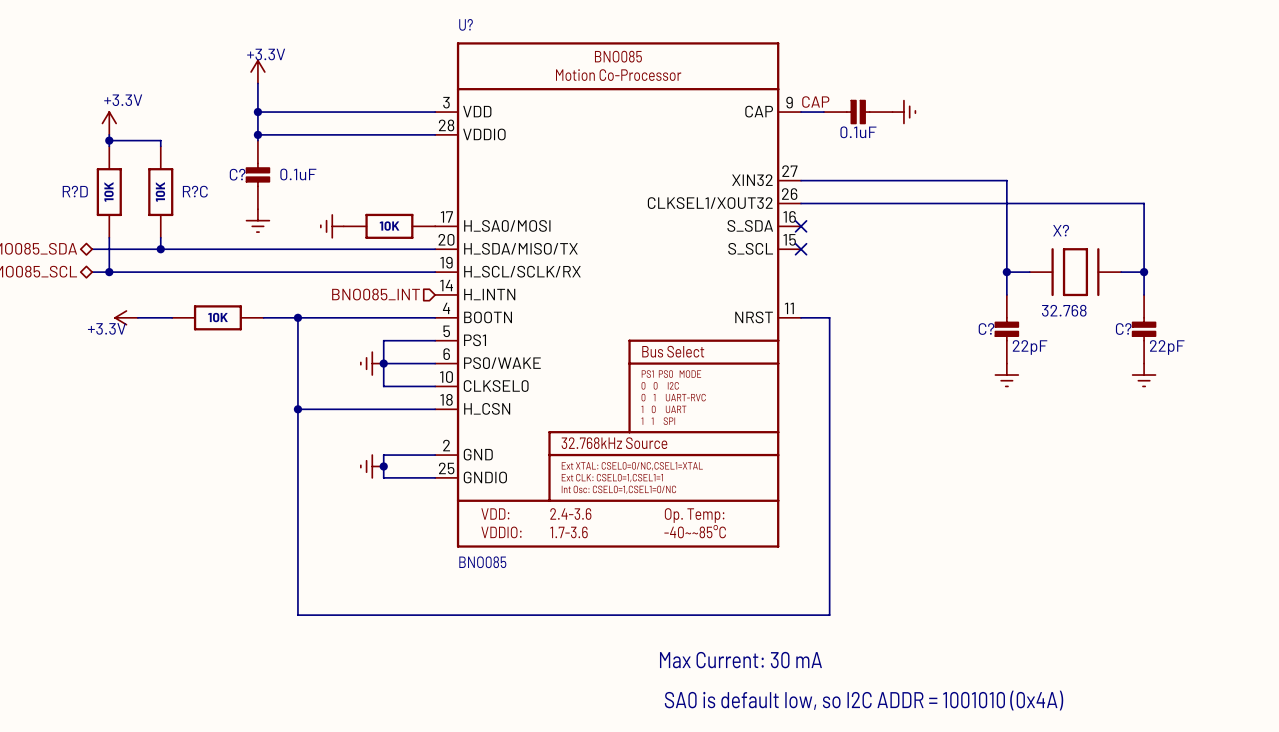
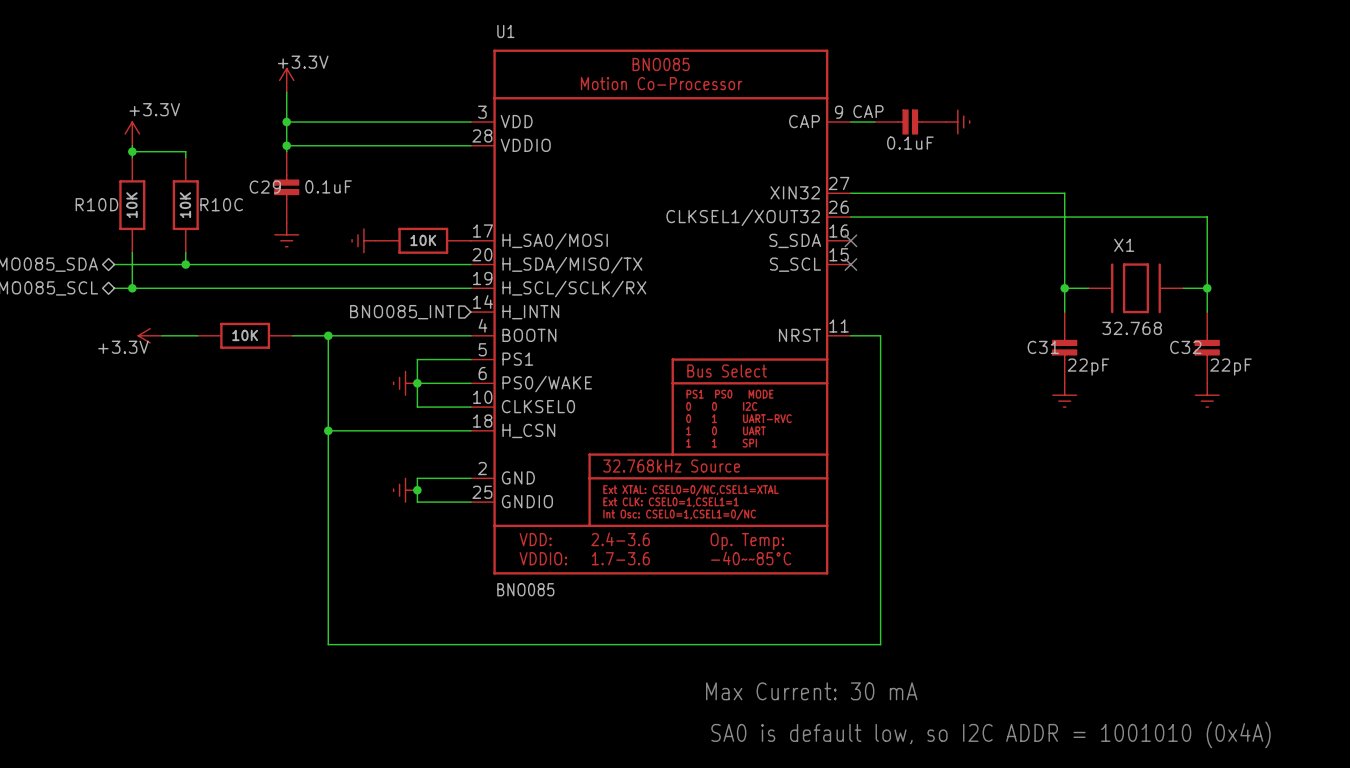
U? name: U? (466, 24) -> U1 (505, 31)
C? name: C? (237, 174) -> C29 (265, 187)
R?D name: R?D (75, 191) -> R10D (96, 204)
R?C name: R?C (195, 191) -> R10C (221, 204)
X? name: X? (1061, 230) -> X1 (1124, 245)
C? name: C? (986, 329) -> C31 (1043, 347)
C? name: C? (1123, 329) -> C32 (1185, 347)

